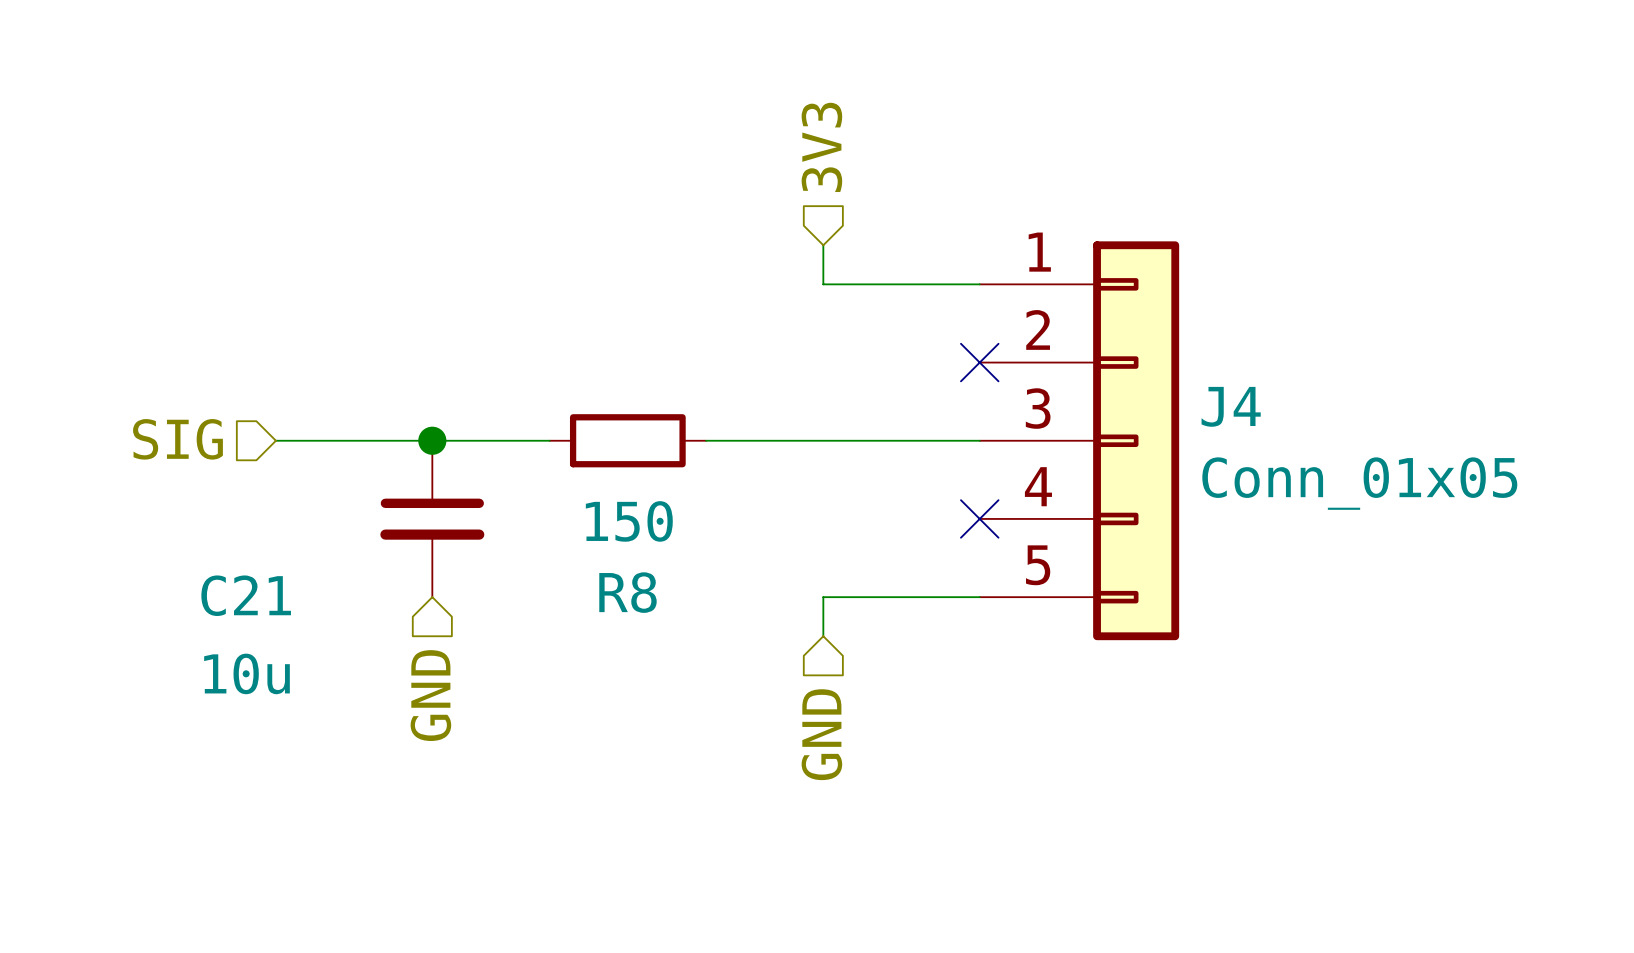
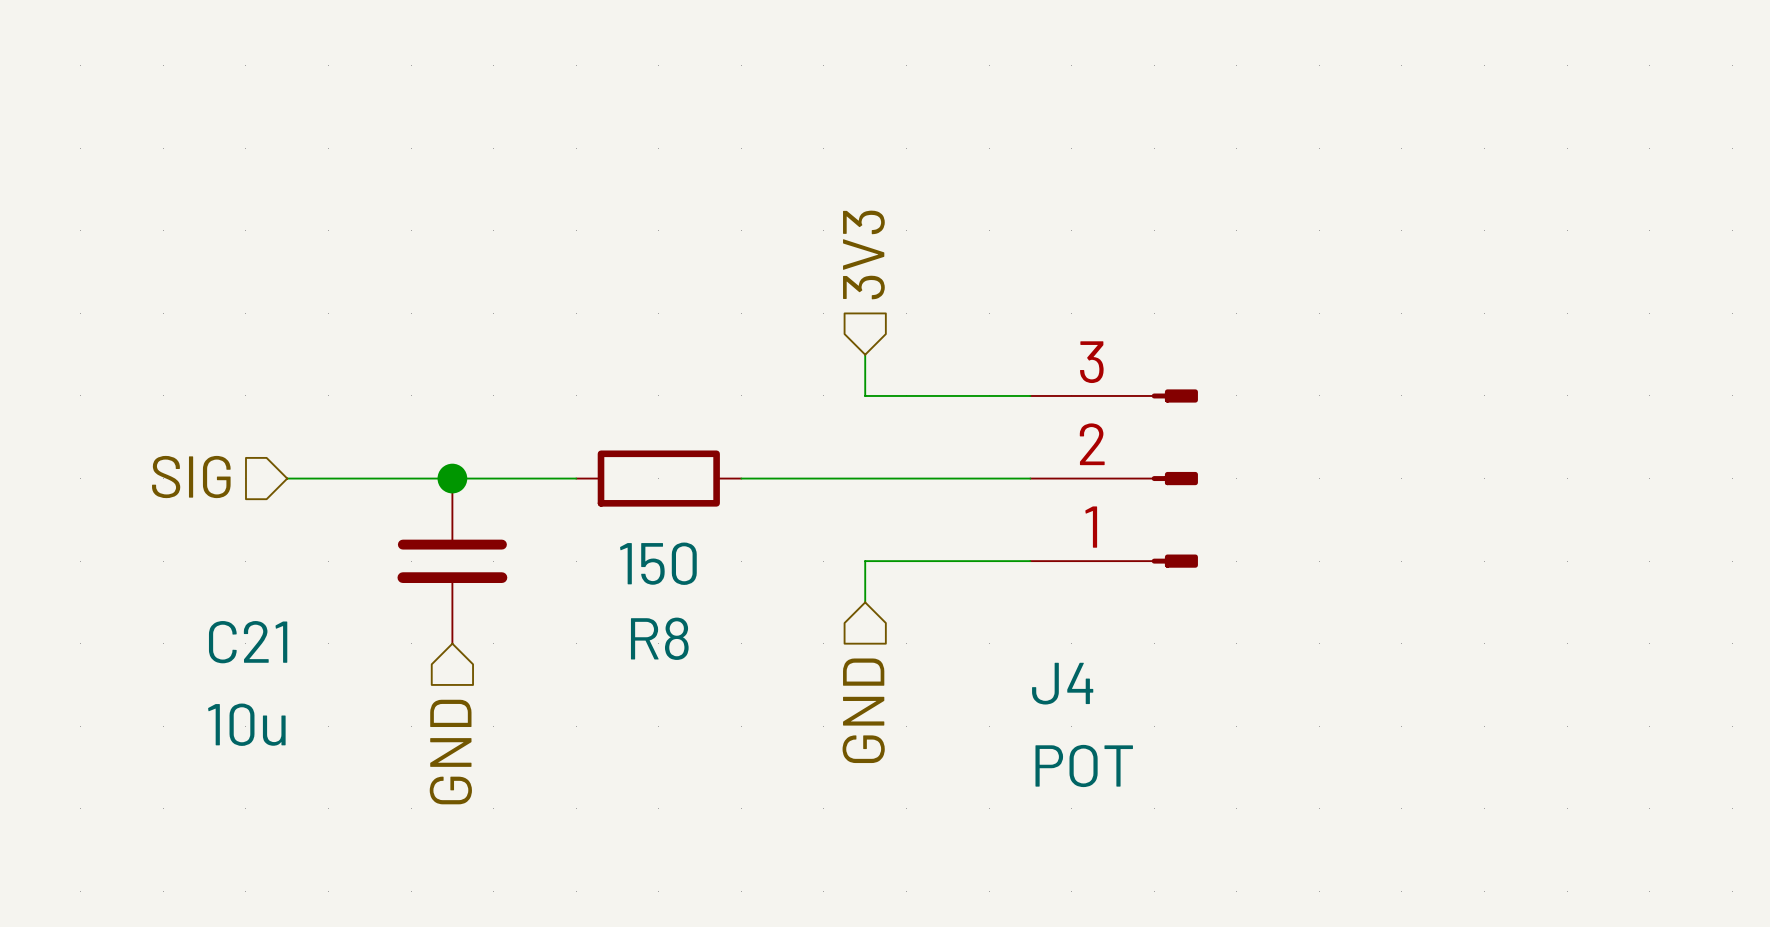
hierarchical label position: 3V3 (821, 147) -> 3V3 (863, 254)
J4 symbol: [979, 241, 1180, 641] -> [1030, 389, 1198, 568]
wire: (823, 245) (823, 284) (979, 284) -> (865, 354) (865, 395) (1030, 395)
no-connect mark: (979, 362) -> none
J4 name position: J4 (1231, 406) -> J4 (1062, 683)
J4 value: Conn_01x05 (1359, 483) -> POT (1084, 765)
no-connect mark: (979, 518) -> none
wire: (979, 597) (823, 597) (823, 636) -> (1030, 561) (865, 561) (865, 602)
hierarchical label position: GND (821, 734) -> GND (863, 710)

